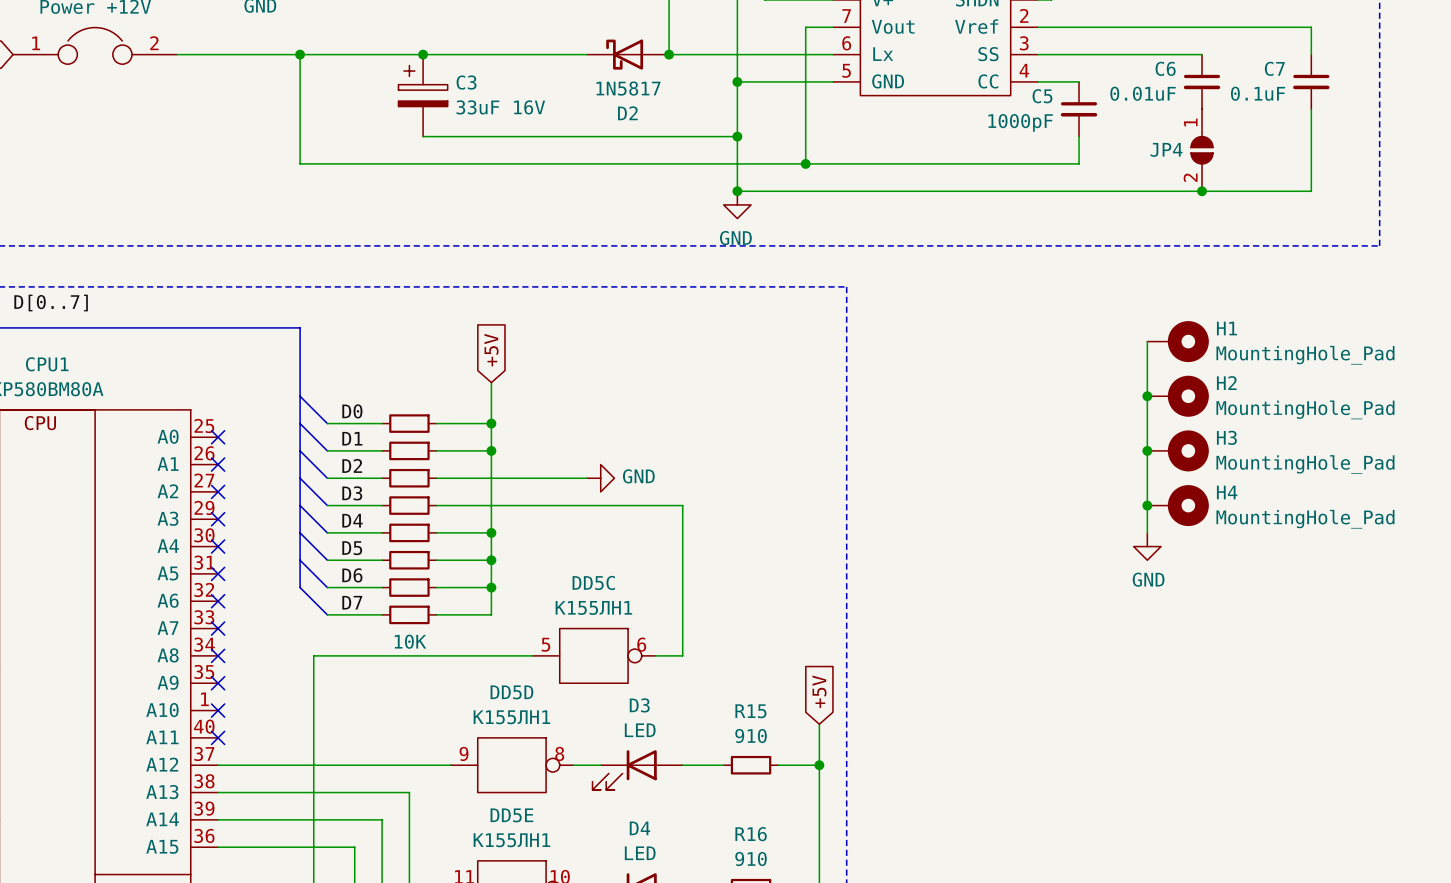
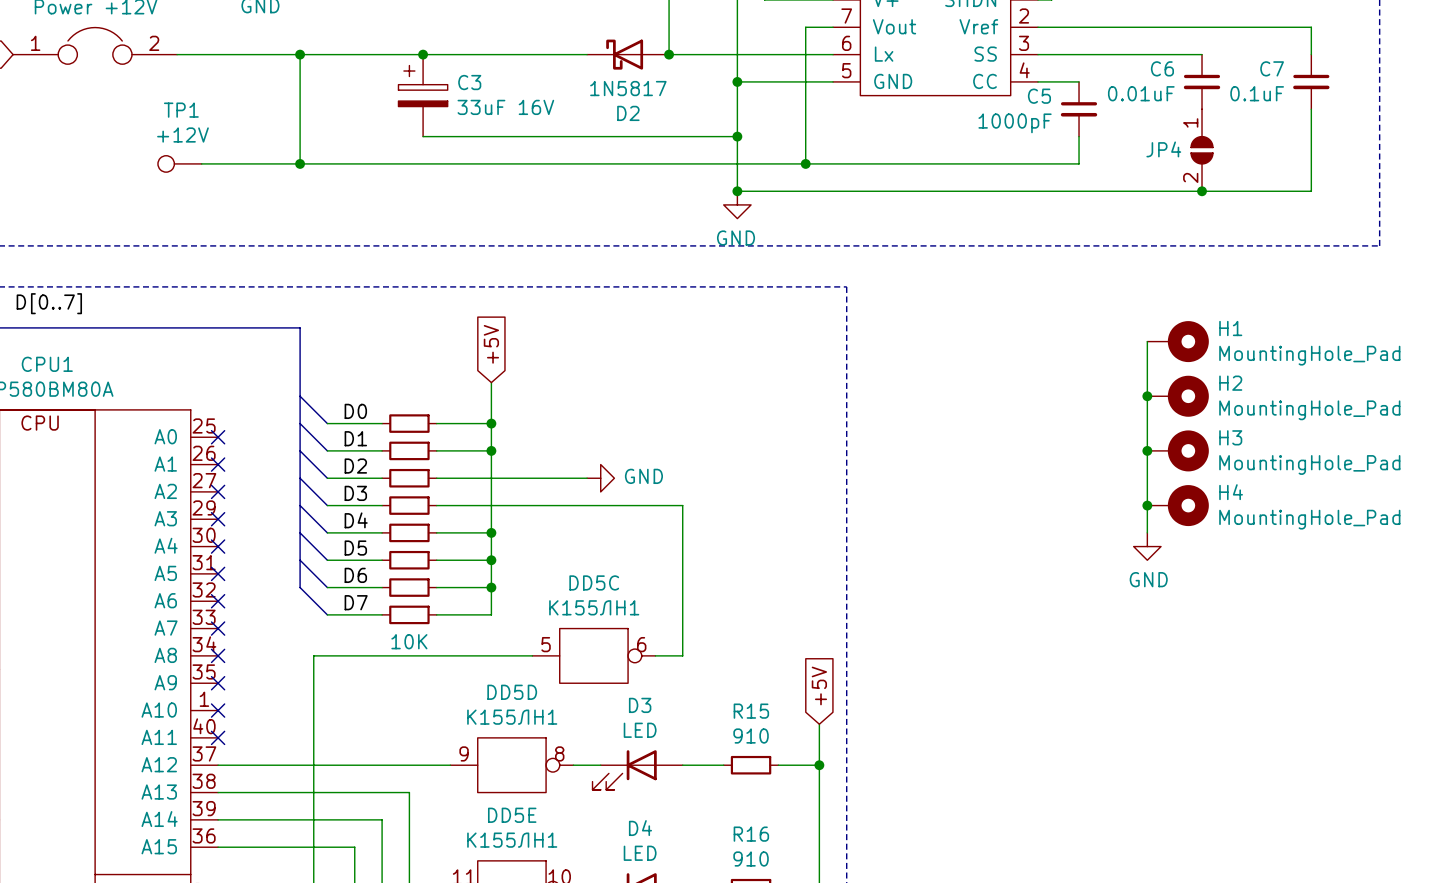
TP1: none -> +12V (179, 163)
wire: none -> (201, 163) (300, 163)
junction: none -> (300, 163)

